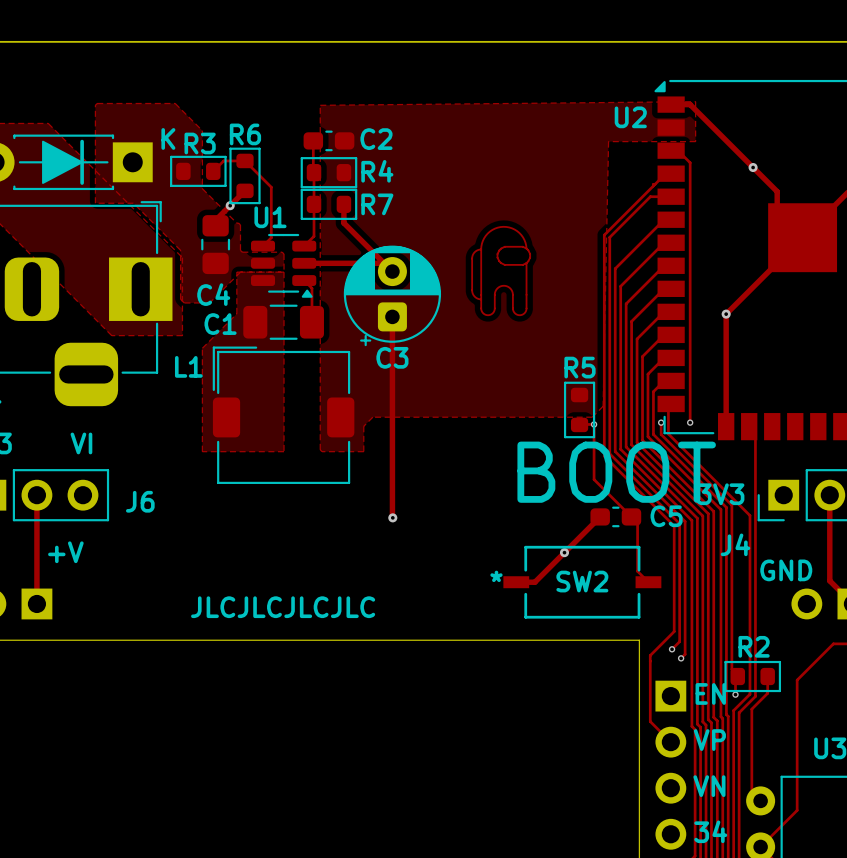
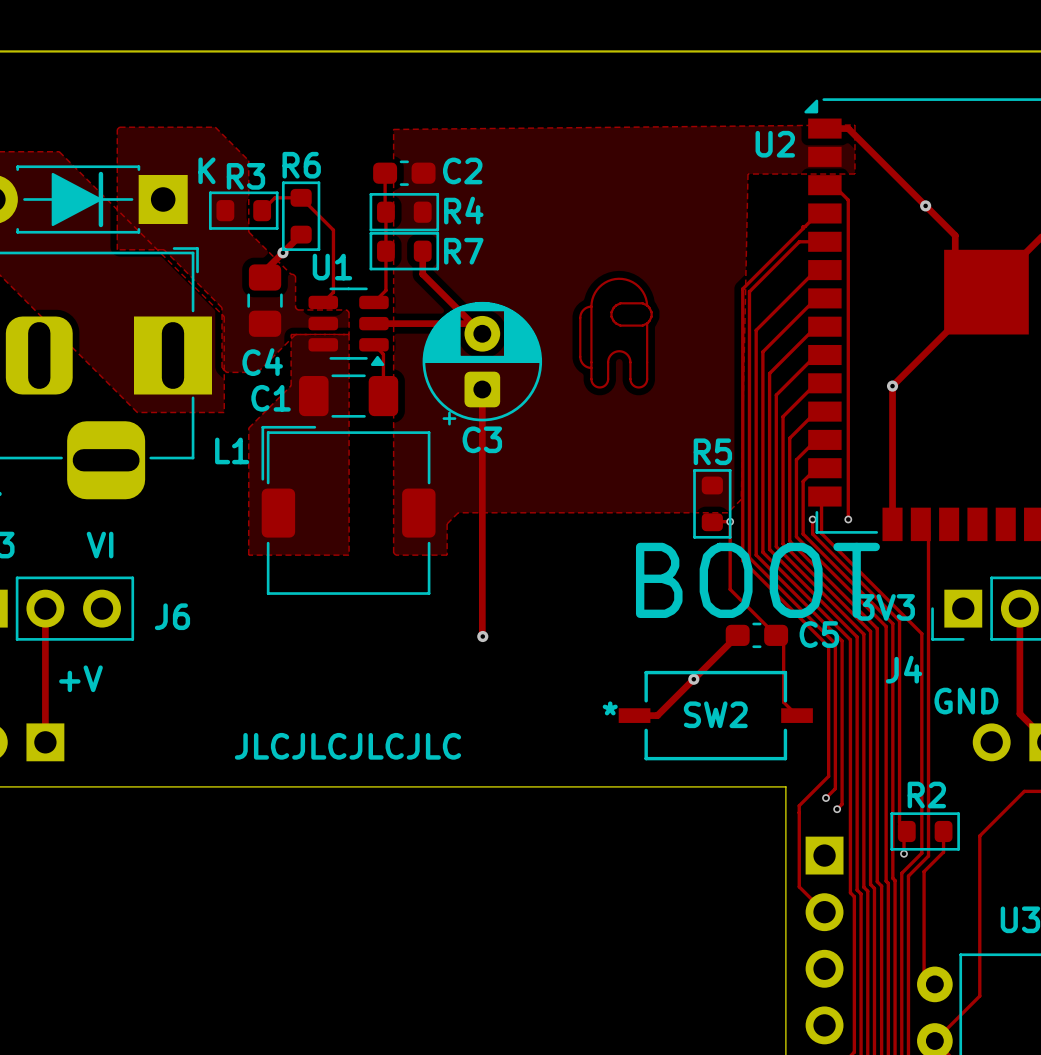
text: EN (710, 693) -> none
text: VP (709, 740) -> none
text: VN (709, 786) -> none
text: 34 (710, 831) -> none

